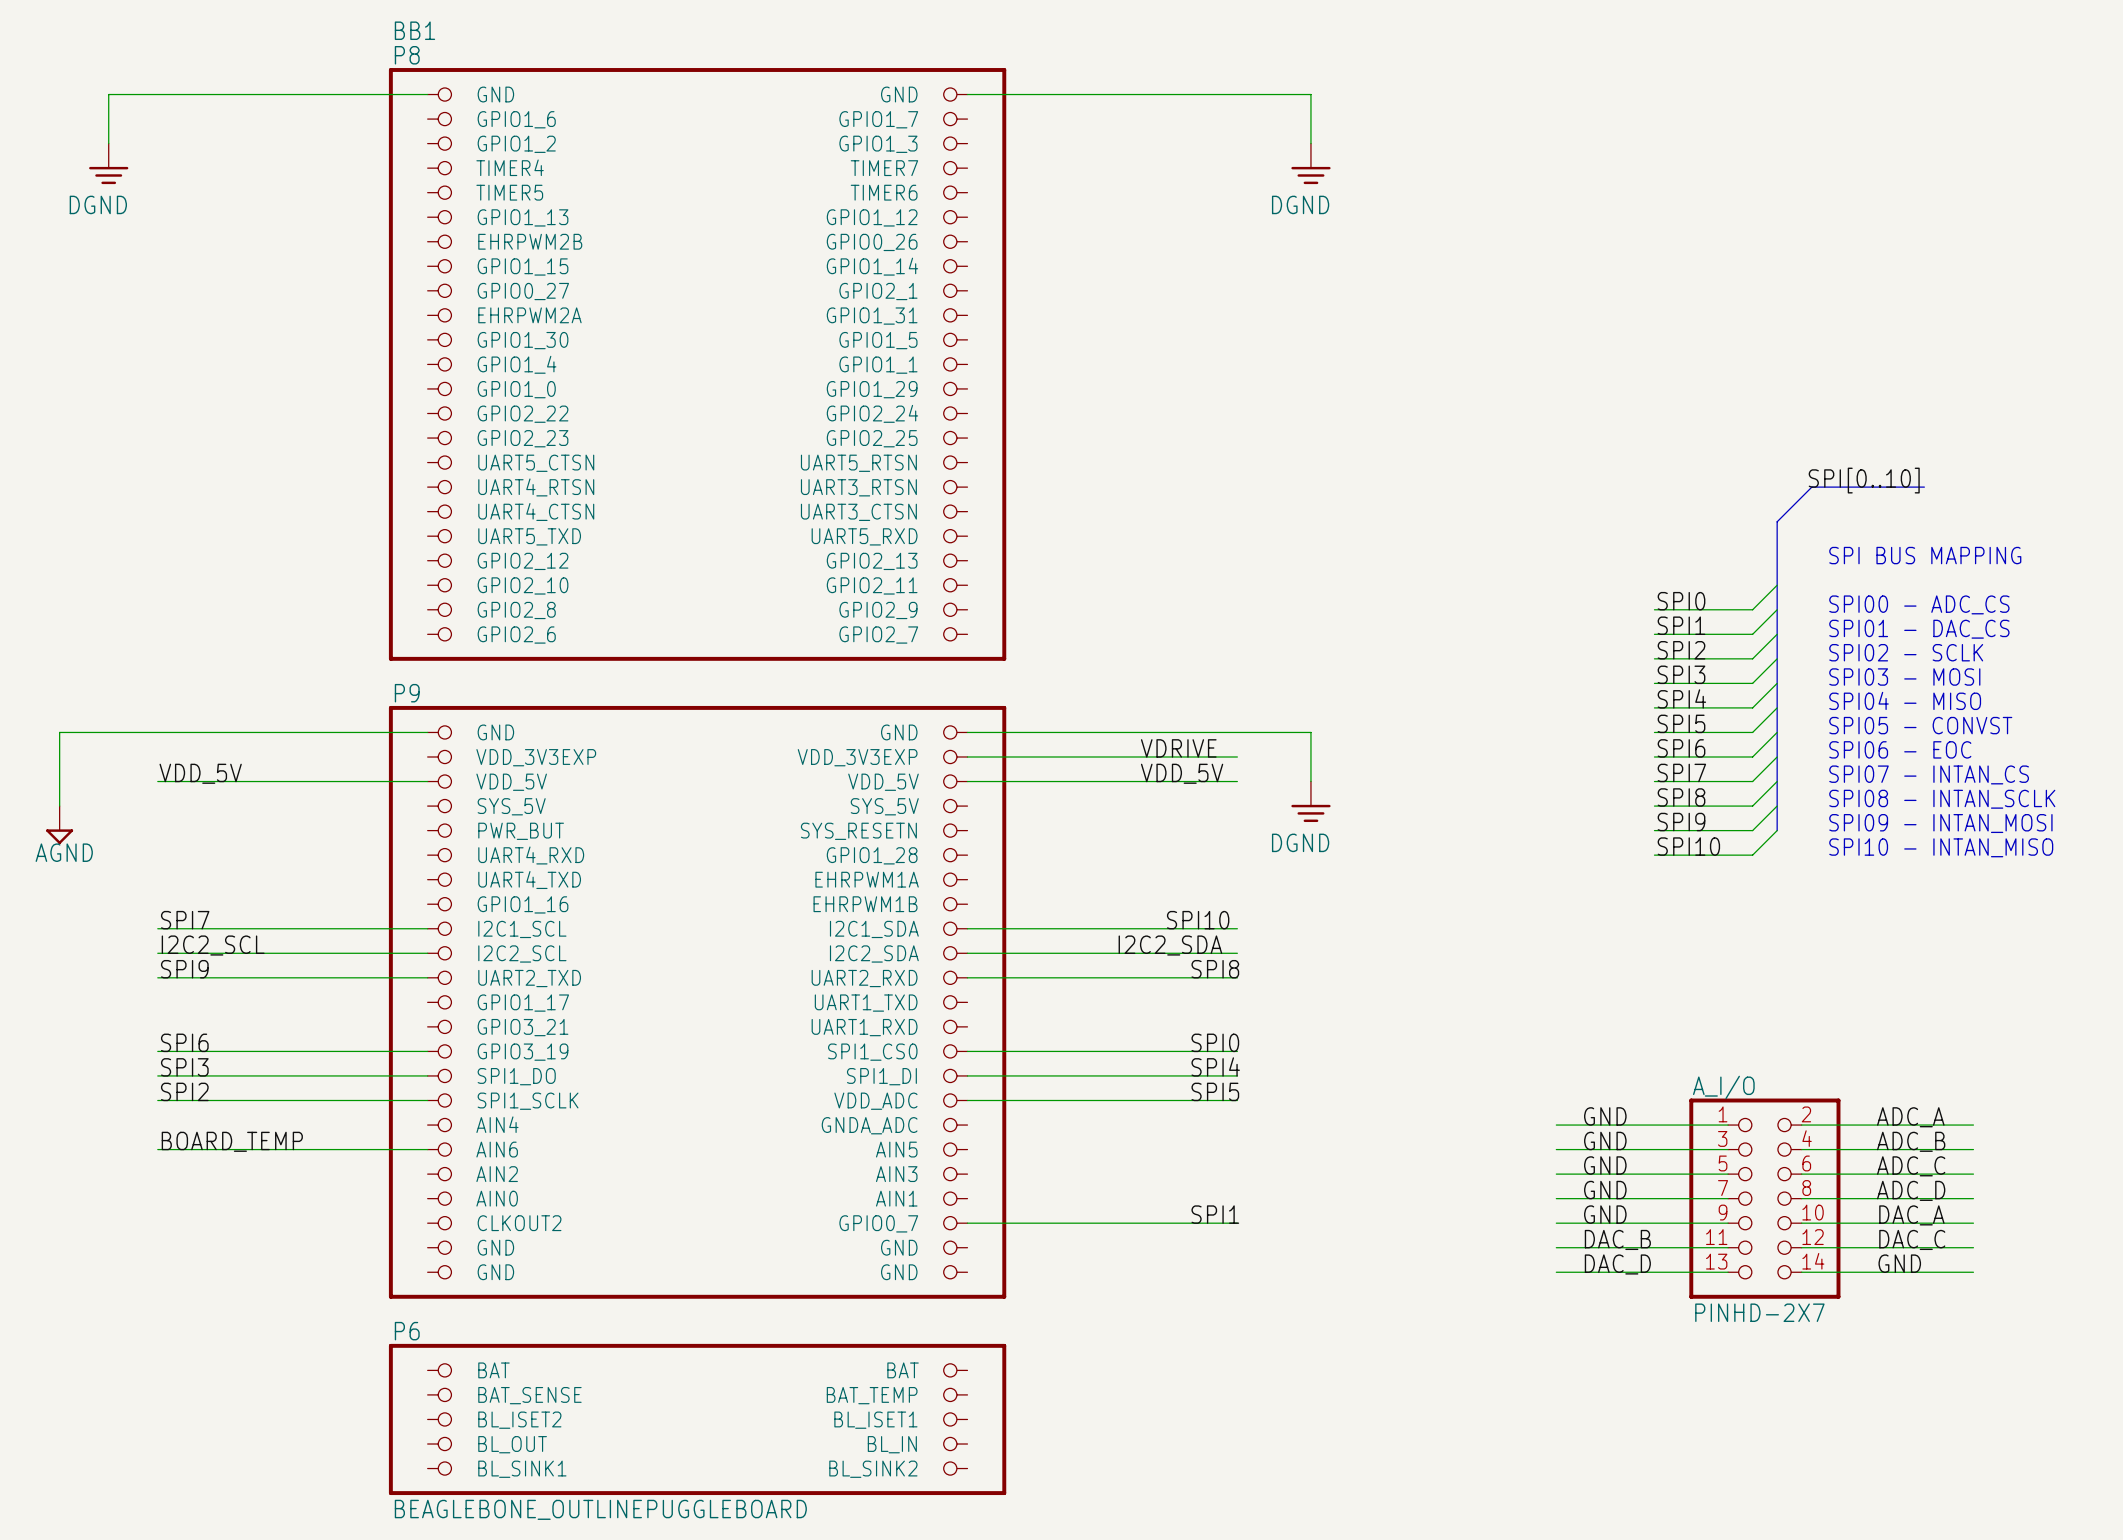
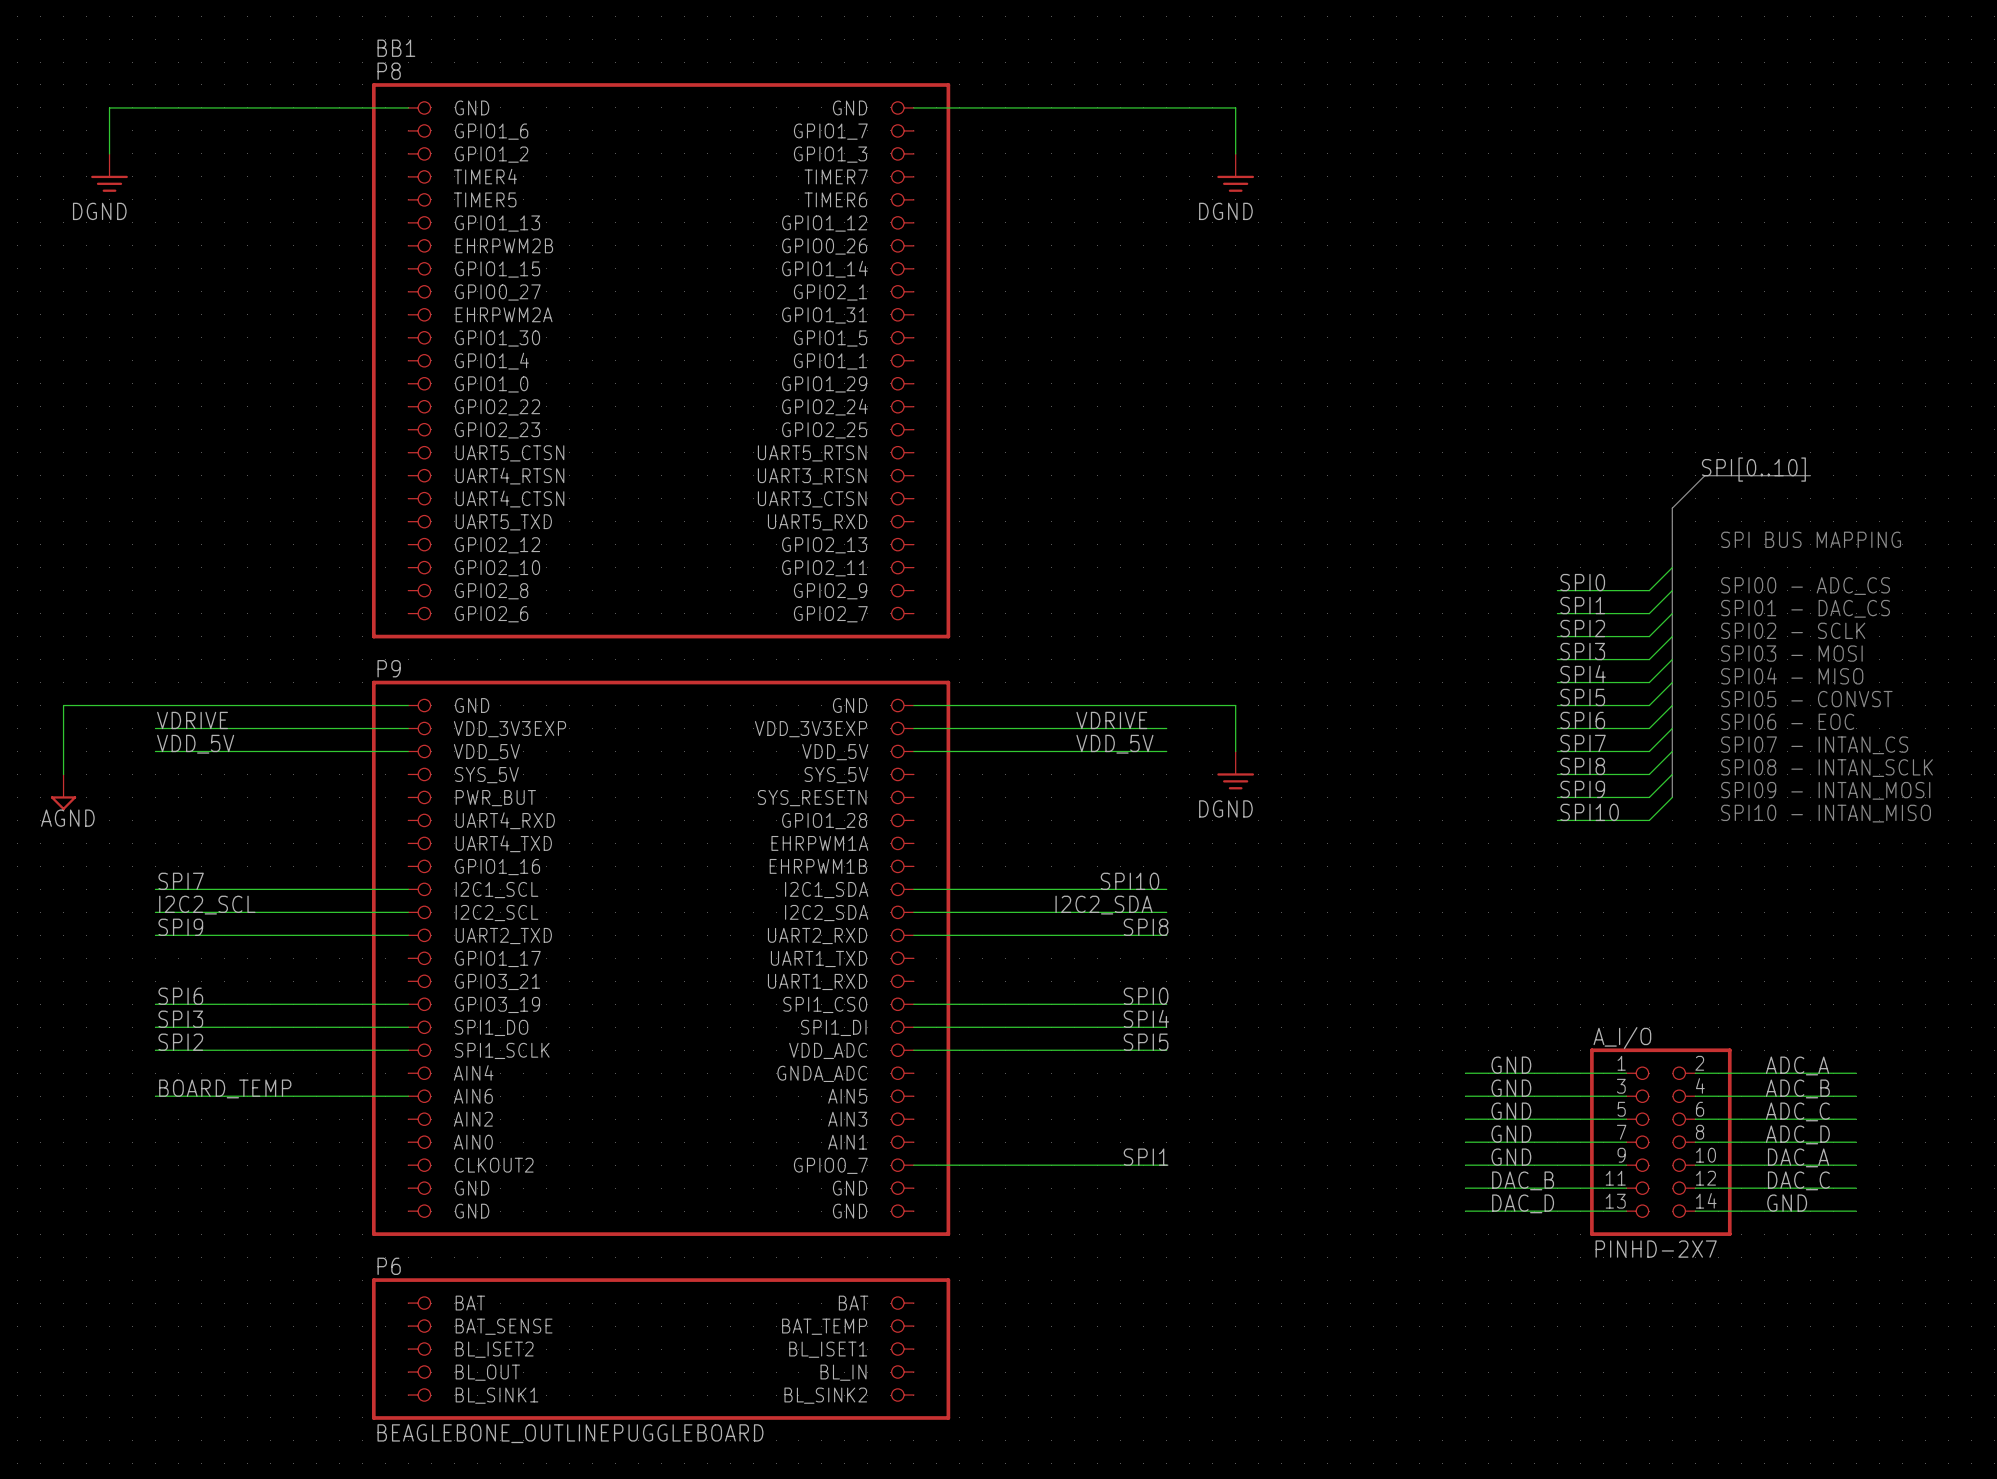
label: none -> VDRIVE (192, 720)
wire: none -> (155, 728) (408, 728)

